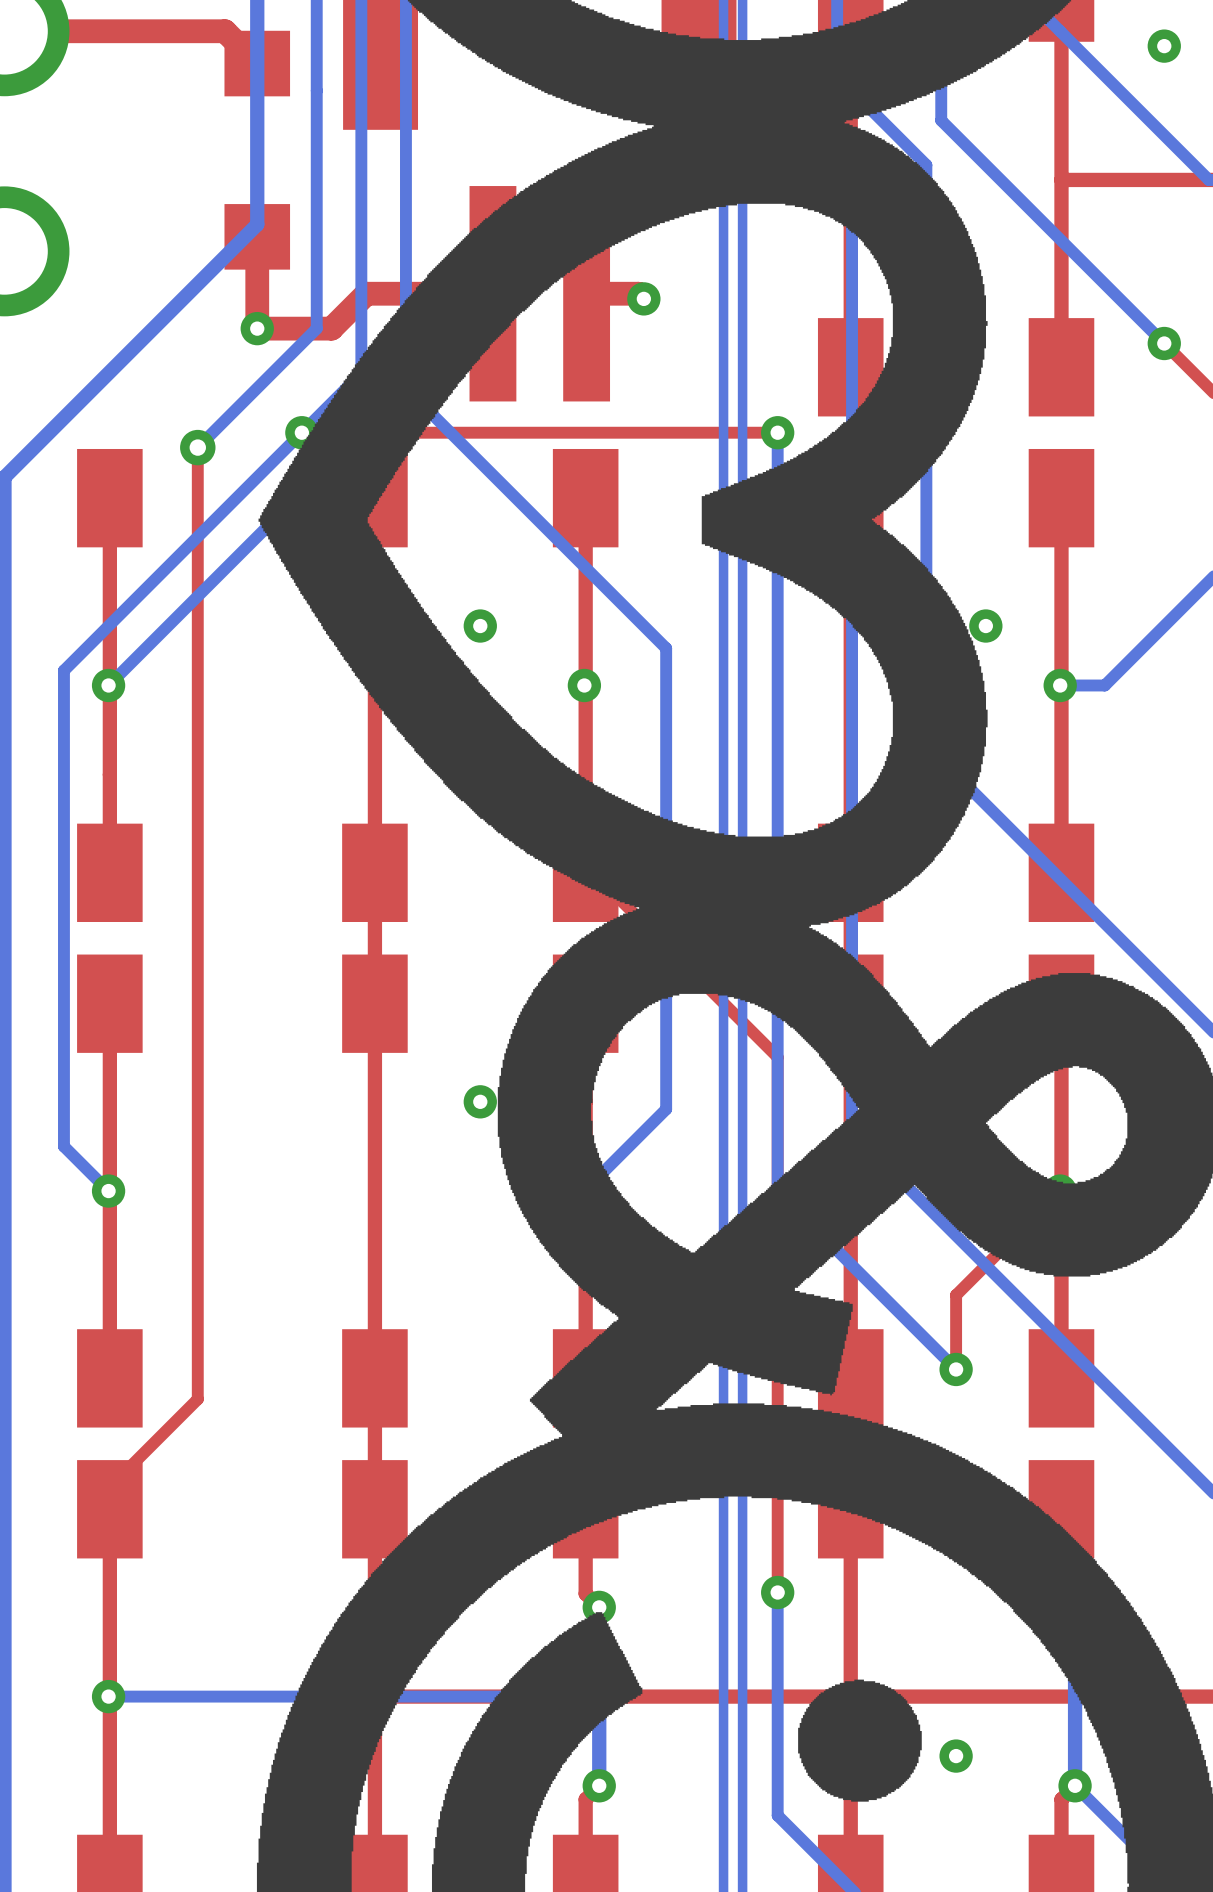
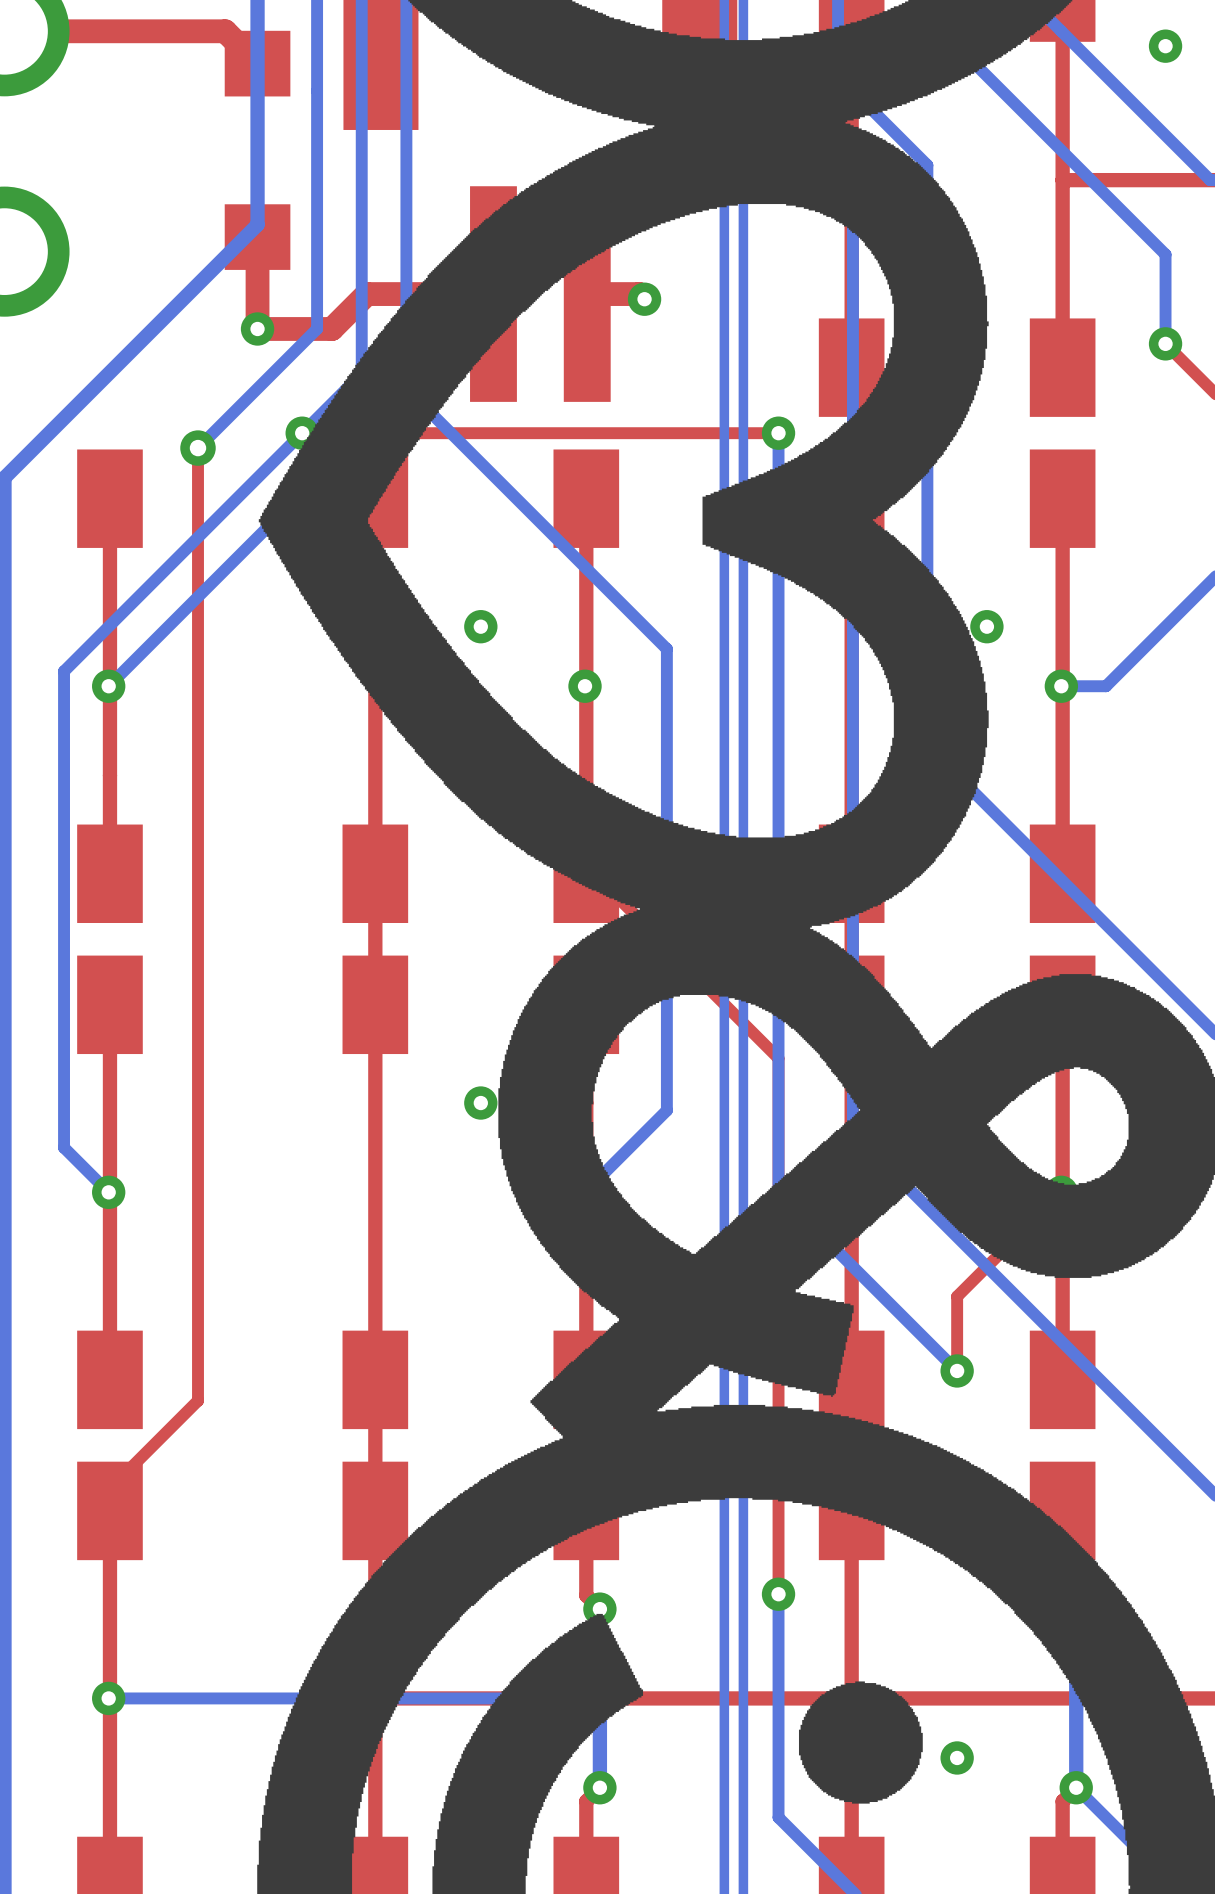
bottom track: (941, 31) (941, 120) (1164, 343) -> (942, 31) (1165, 254) (1165, 343)

